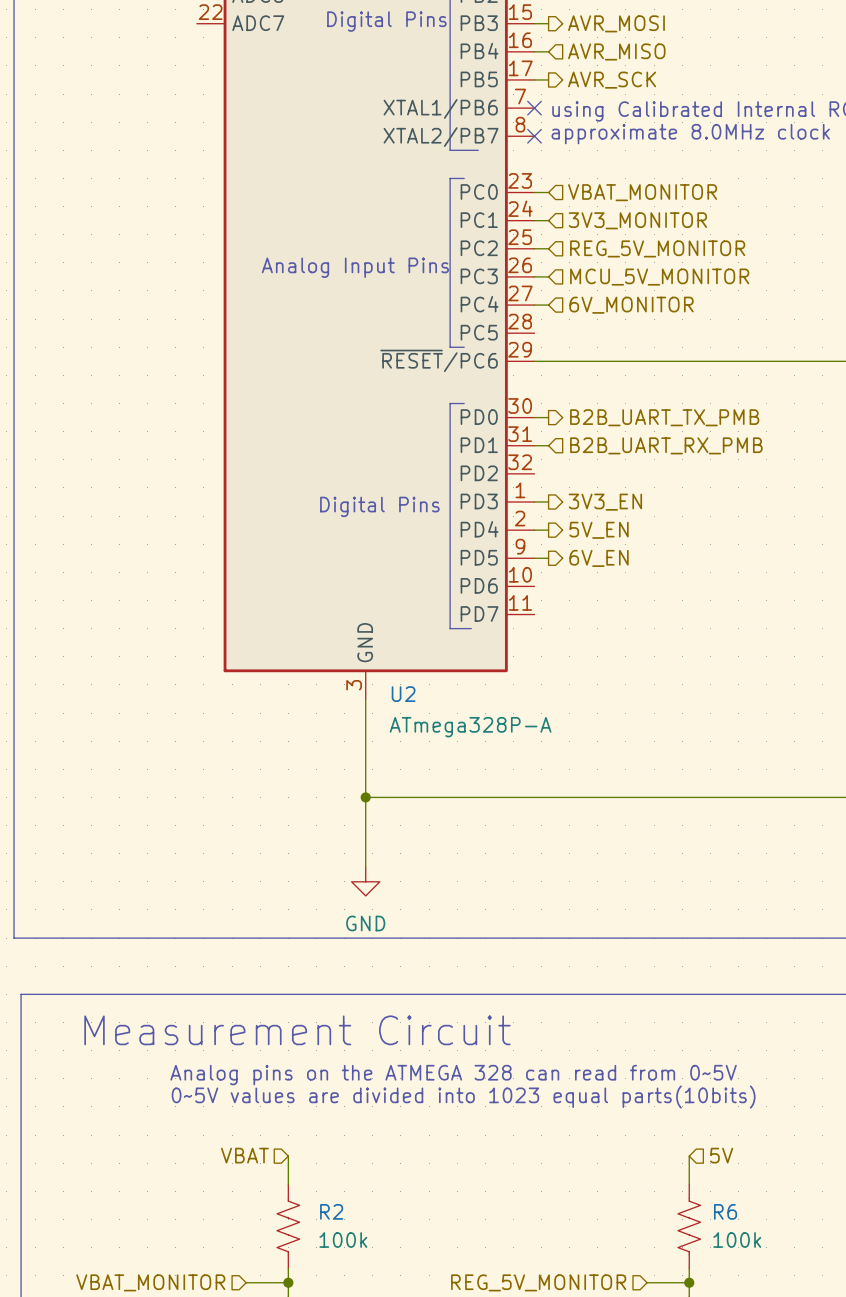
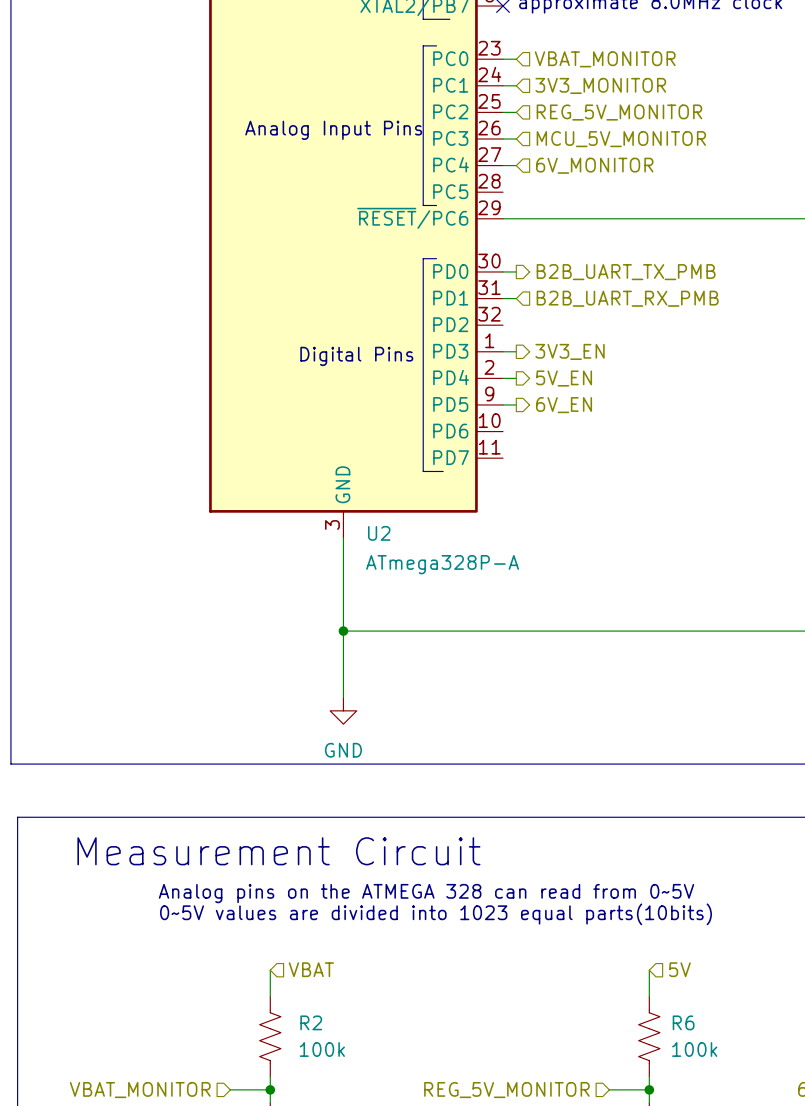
hierarchical label rotation: 0° (244, 1155) -> 180° (311, 969)
hierarchical label position: VBAT (244, 1155) -> VBAT (311, 969)

